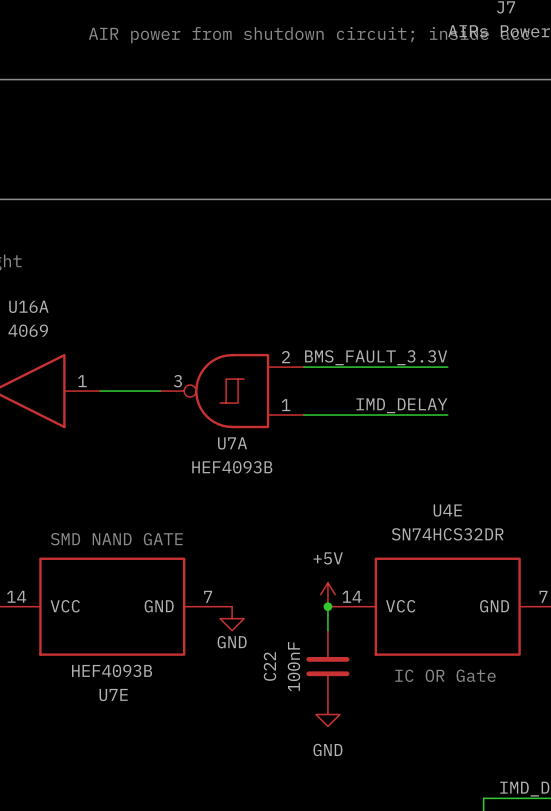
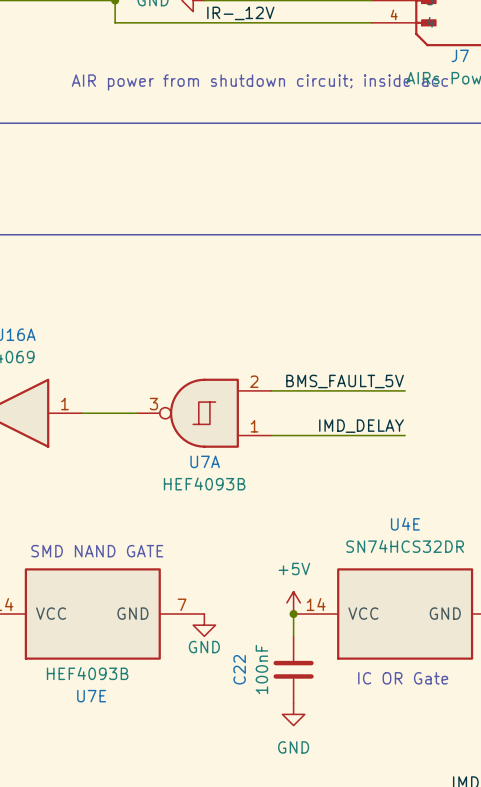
label: BMS_FAULT_3.3V (376, 357) -> BMS_FAULT_5V (345, 381)

